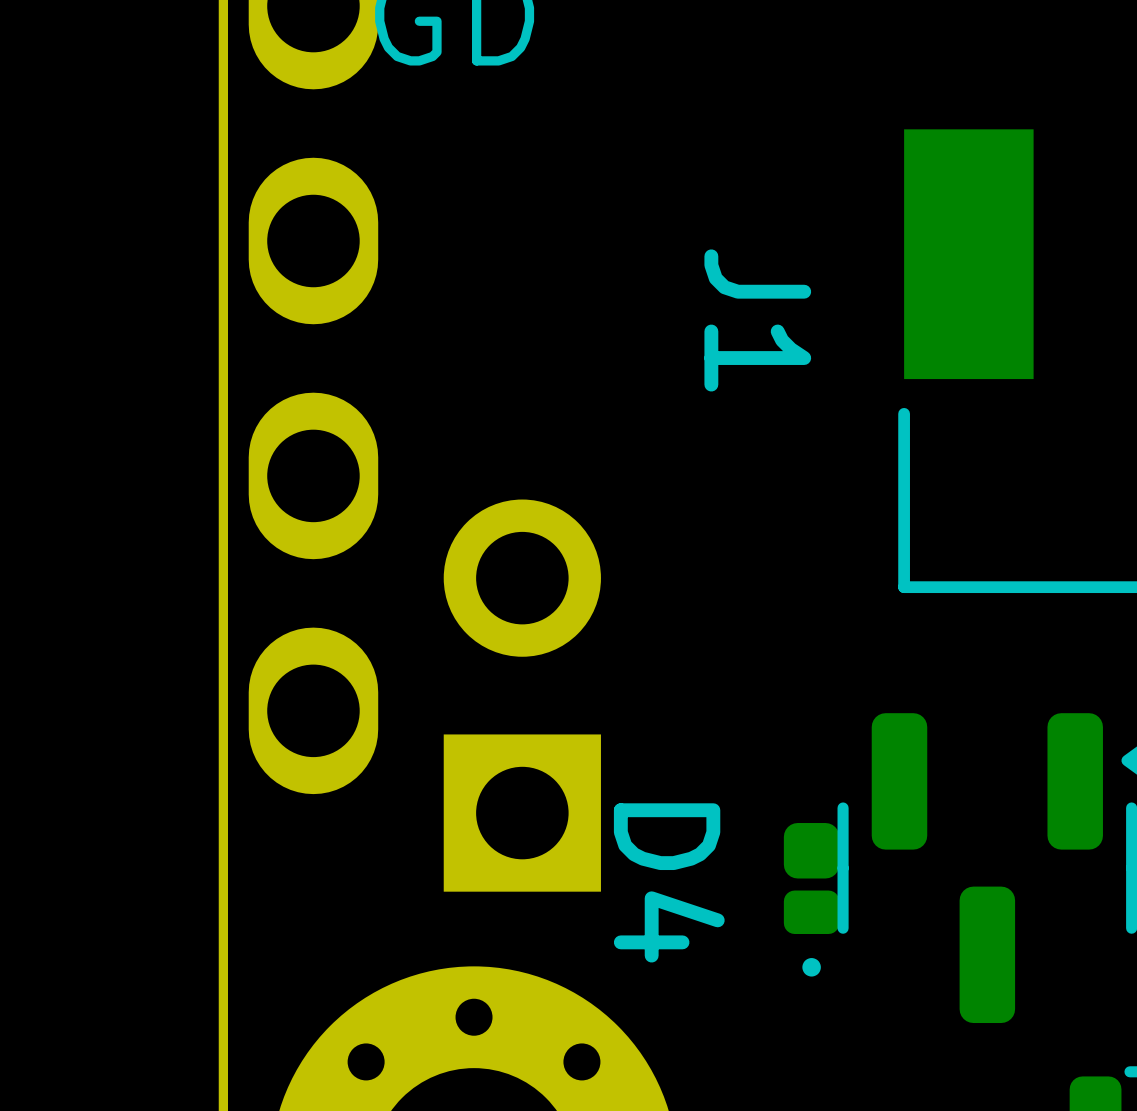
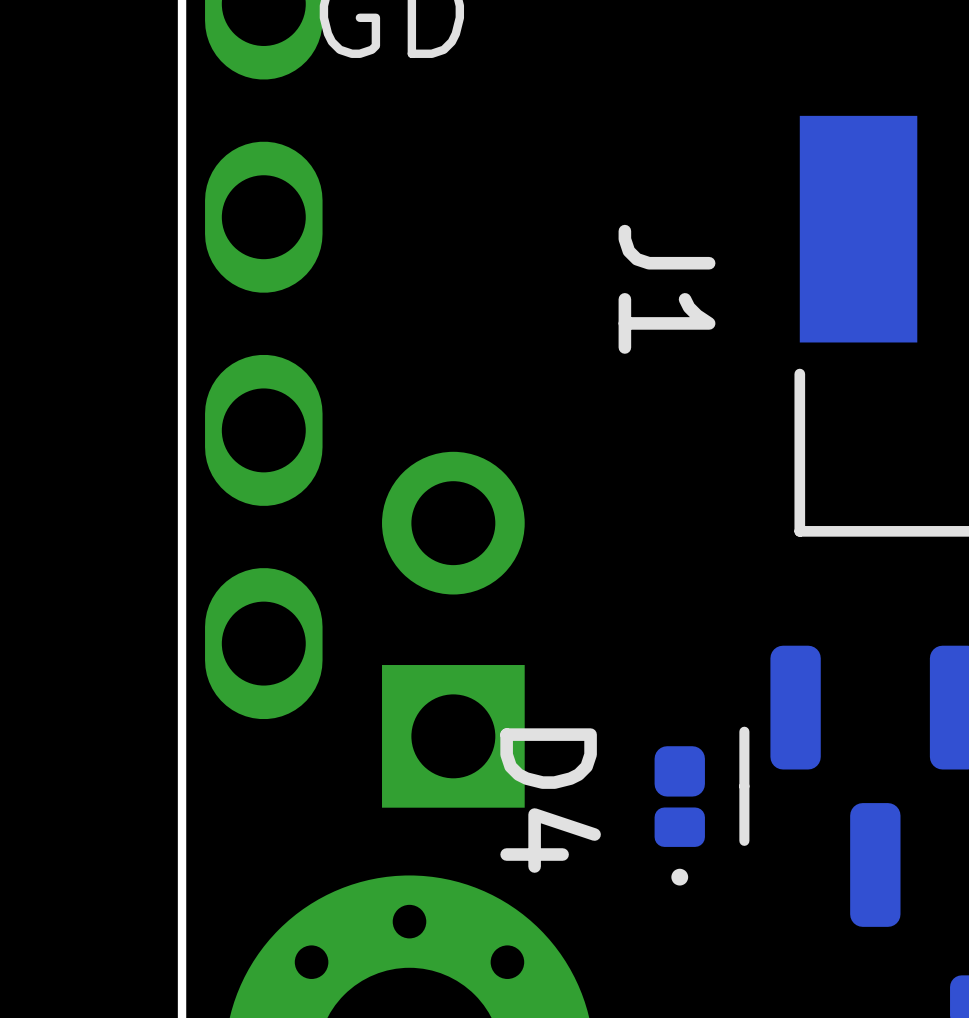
D4 position: (811, 899) -> (679, 815)

